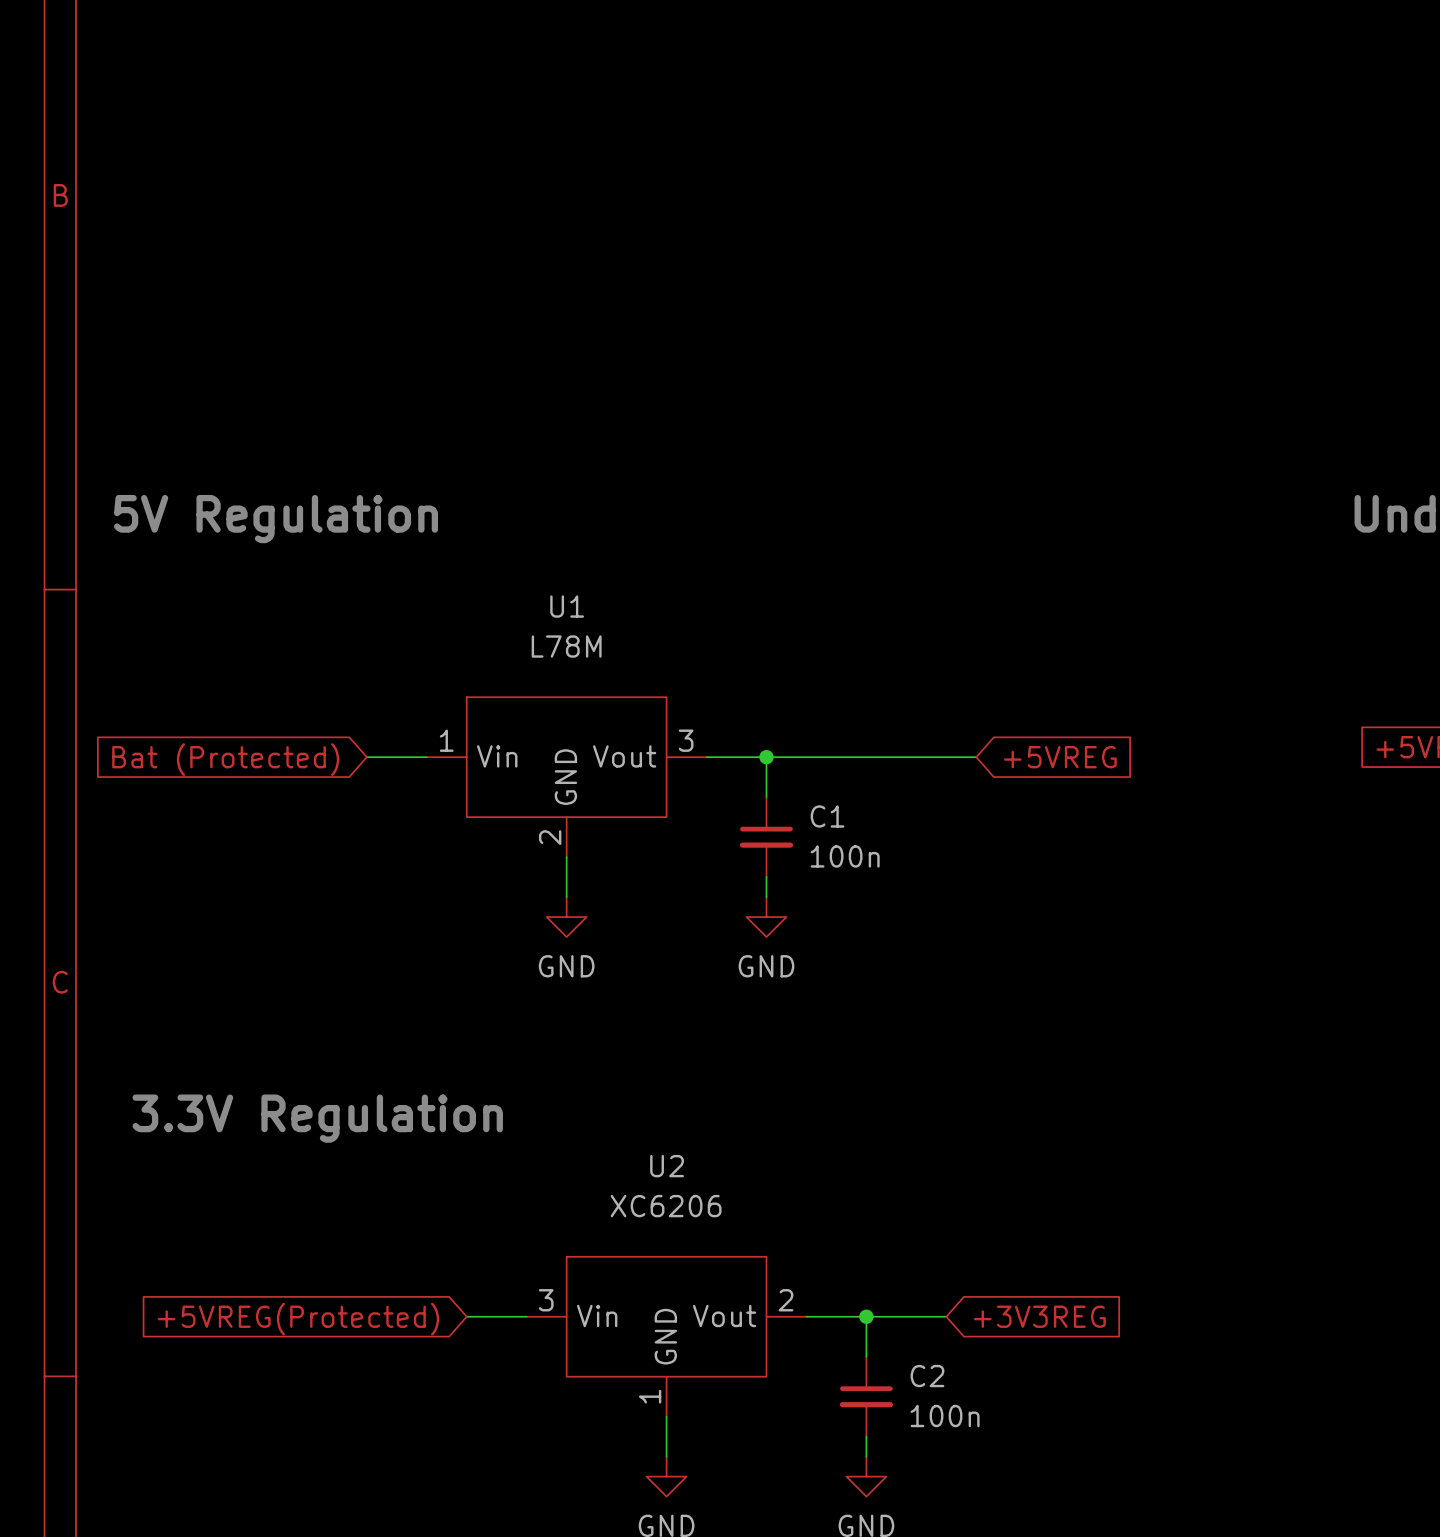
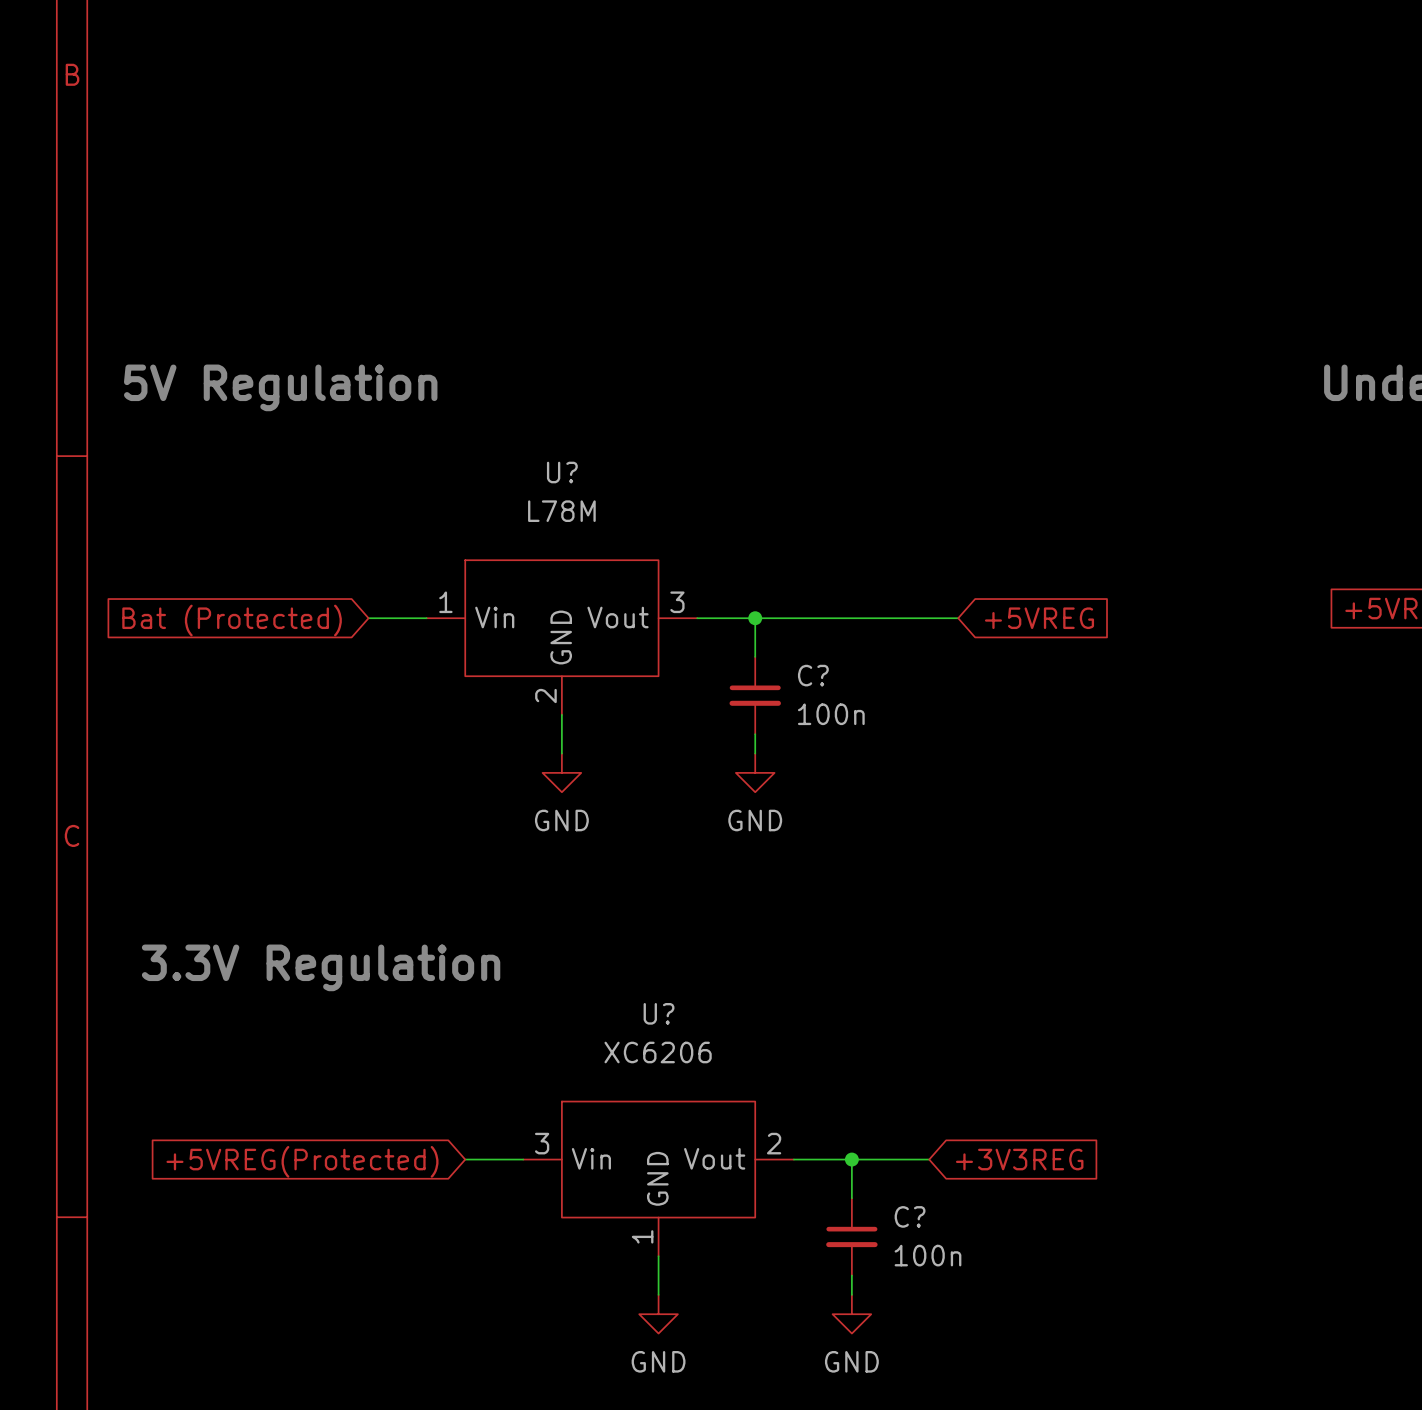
U1 name: U1 (567, 606) -> U? (562, 472)
C1 name: C1 (827, 816) -> C? (813, 675)
U2 name: U2 (667, 1166) -> U? (659, 1013)
C2 name: C2 (927, 1376) -> C? (910, 1216)

